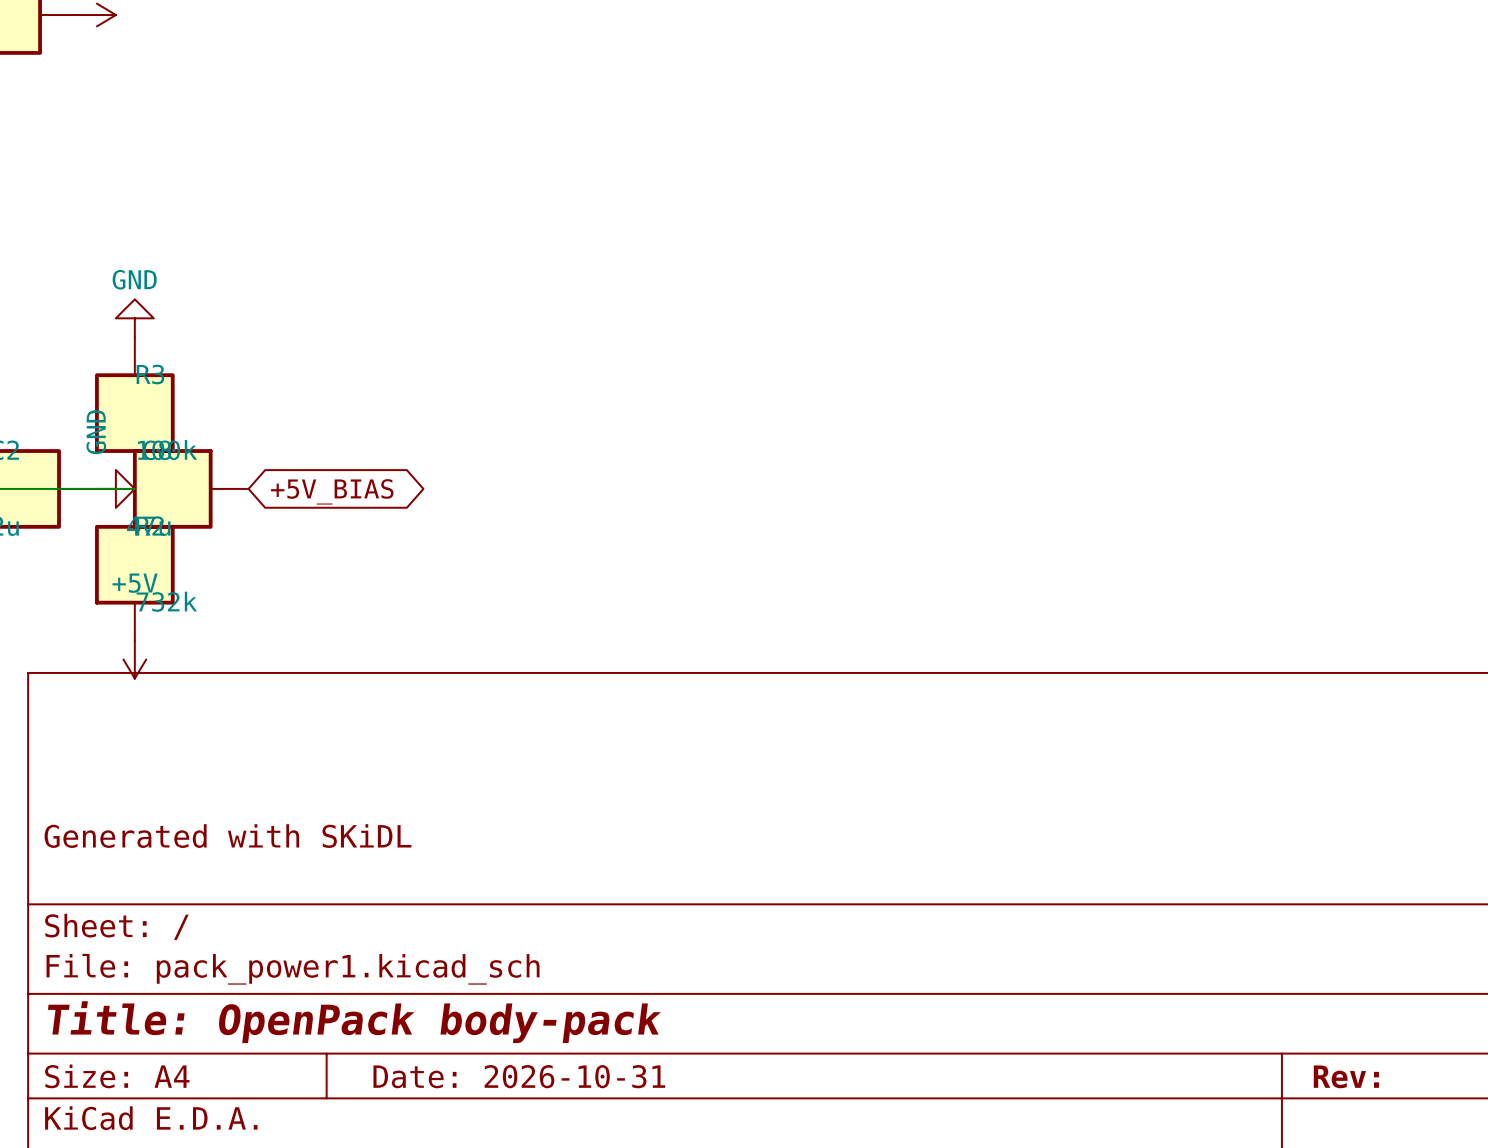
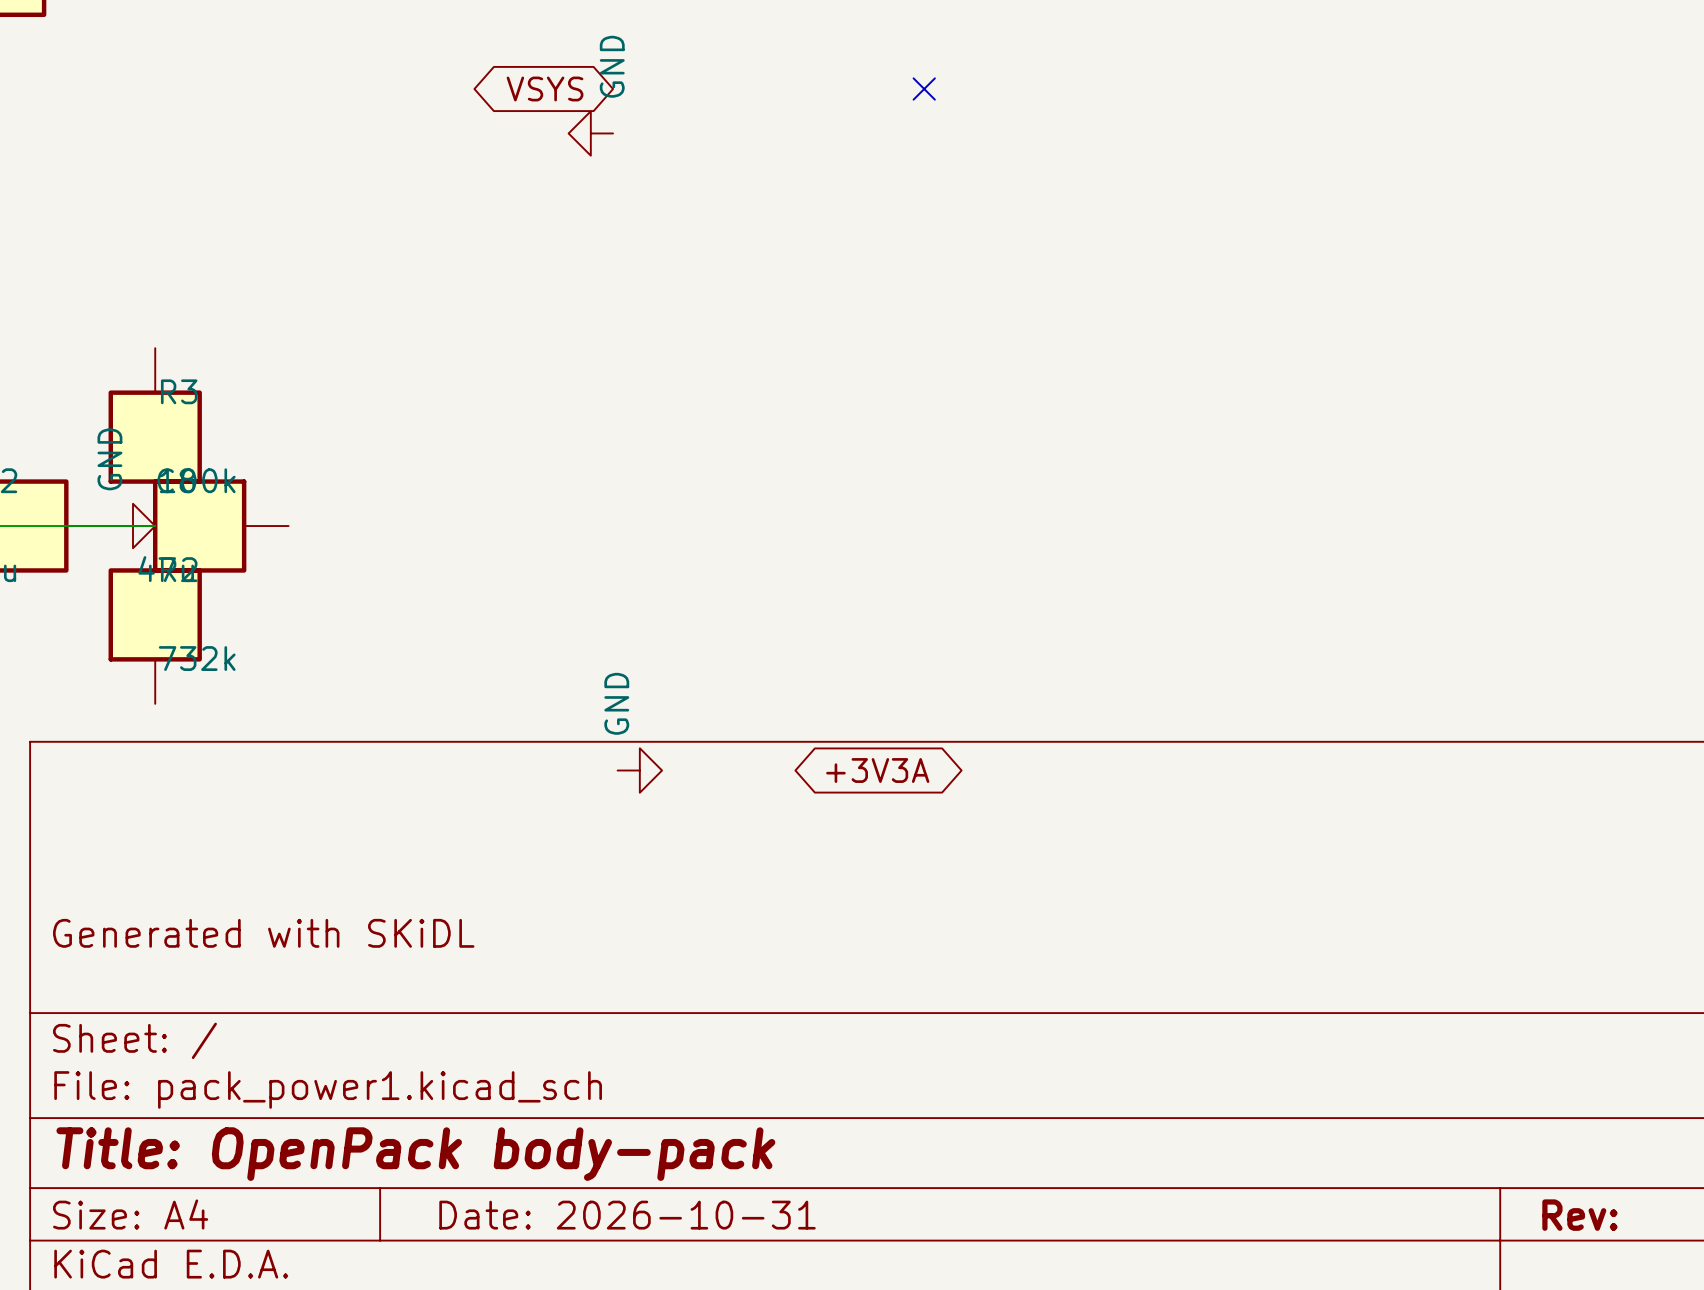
global label: none -> VSYS (545, 89)
no-connect mark: none -> (924, 89)
power symbol: none -> GND (590, 133)
power symbol: GND (134, 318) -> none
global label: +5V_BIAS (332, 491) -> none
power symbol: +5V (134, 659) -> none
power symbol: none -> GND (639, 770)
global label: none -> +3V3A (877, 770)

